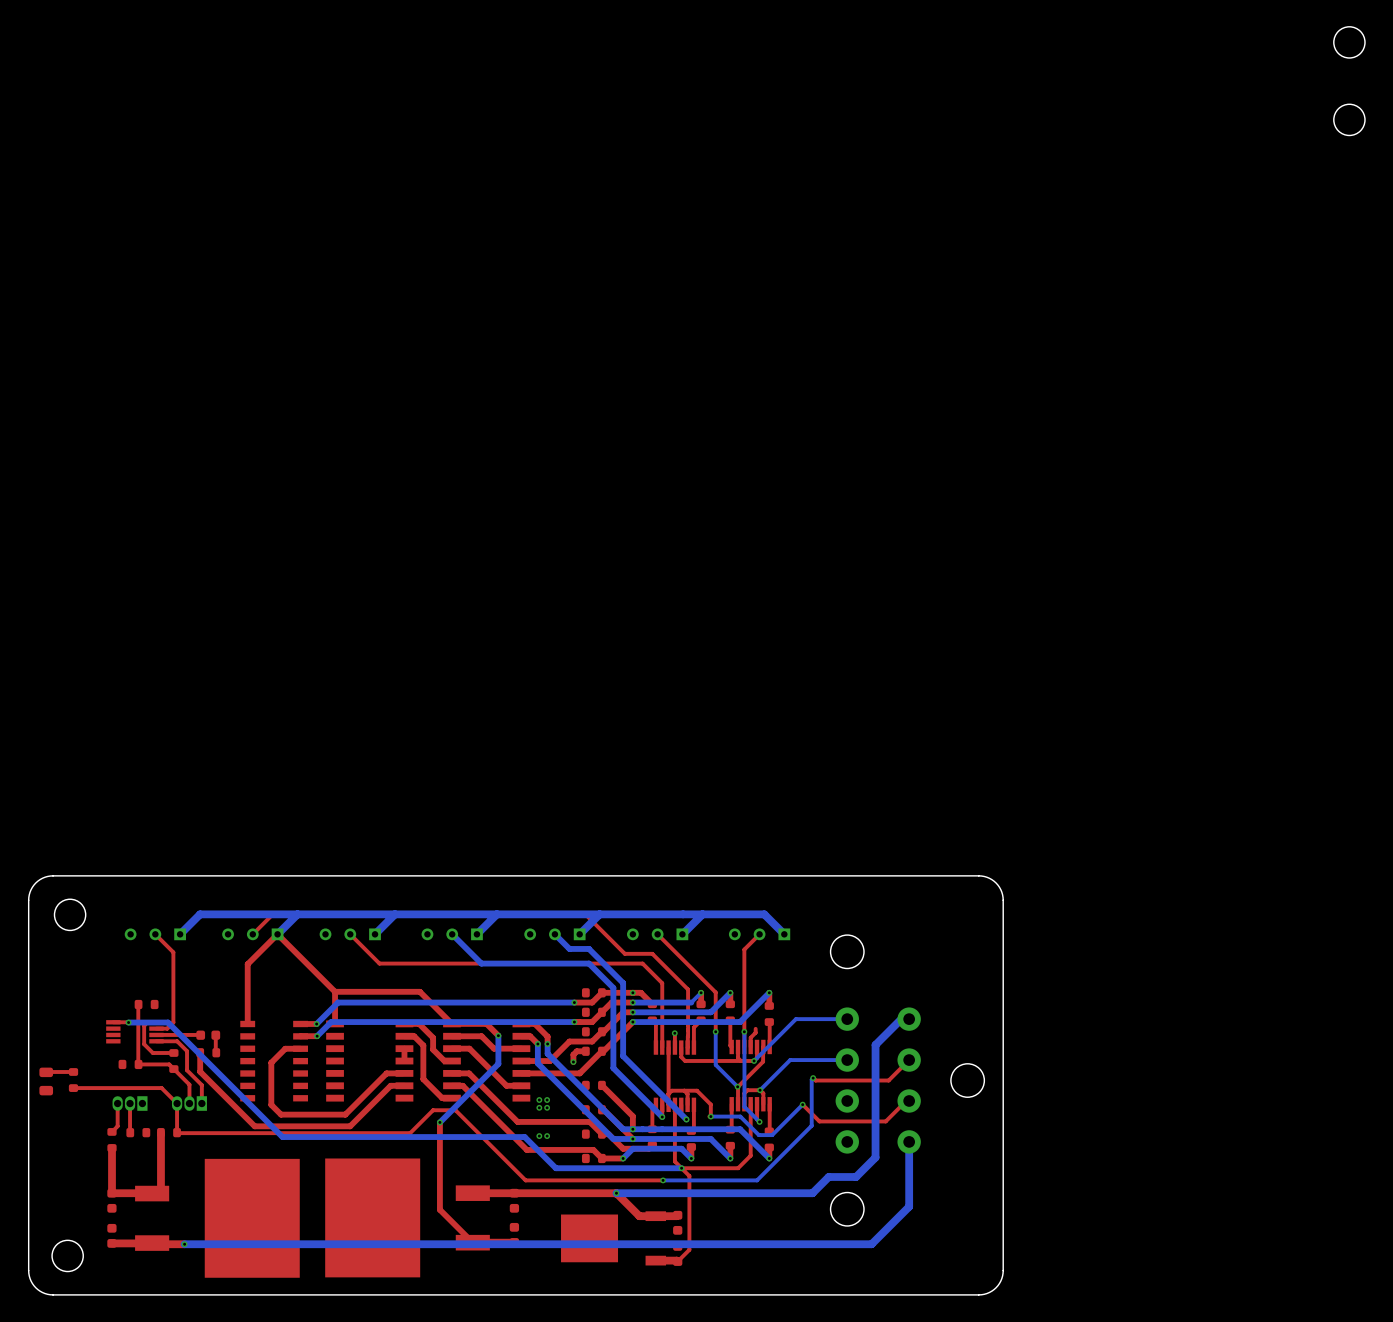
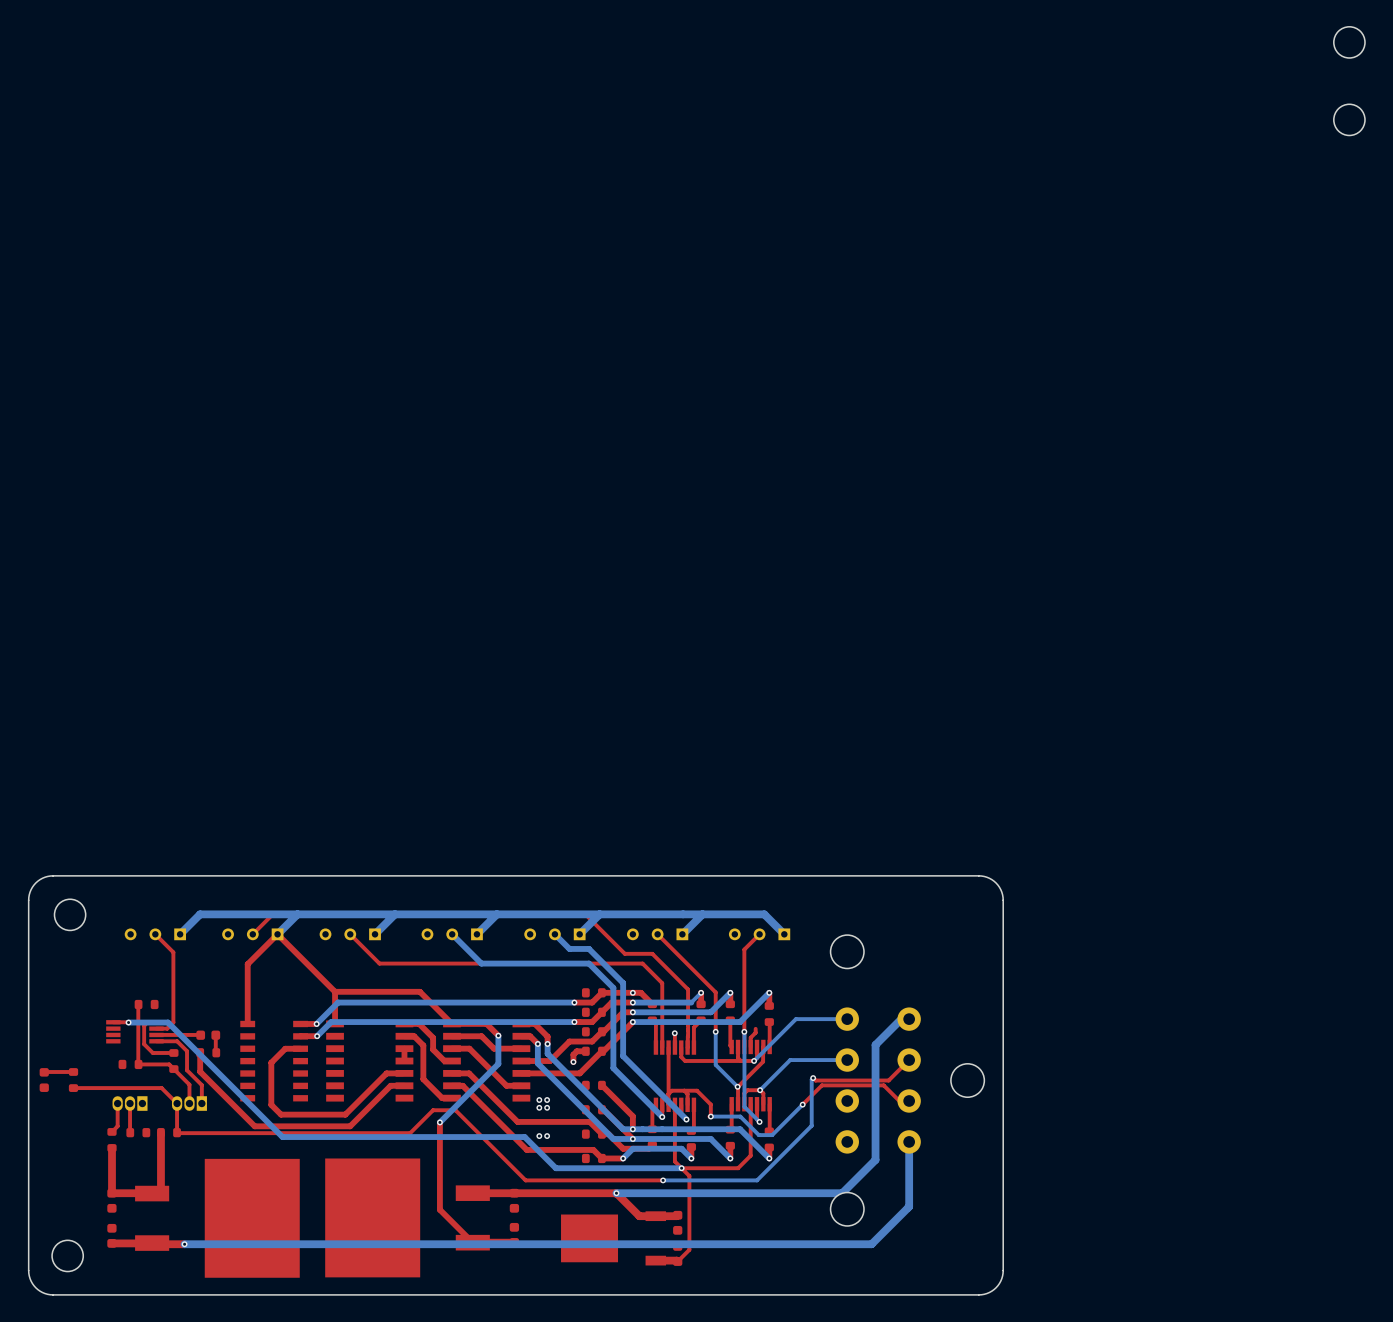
part footprint: [39, 1067, 54, 1096] -> [39, 1068, 49, 1092]
top track: (802, 1104) (819, 1121) (885, 1121) (907, 1099) (907, 1109) -> (802, 1104) (821, 1085) (883, 1085) (907, 1109)
bottom track: (875, 1157) (856, 1177) (828, 1177) (812, 1193) -> (875, 1157) (875, 1159) (842, 1193) (812, 1193)

